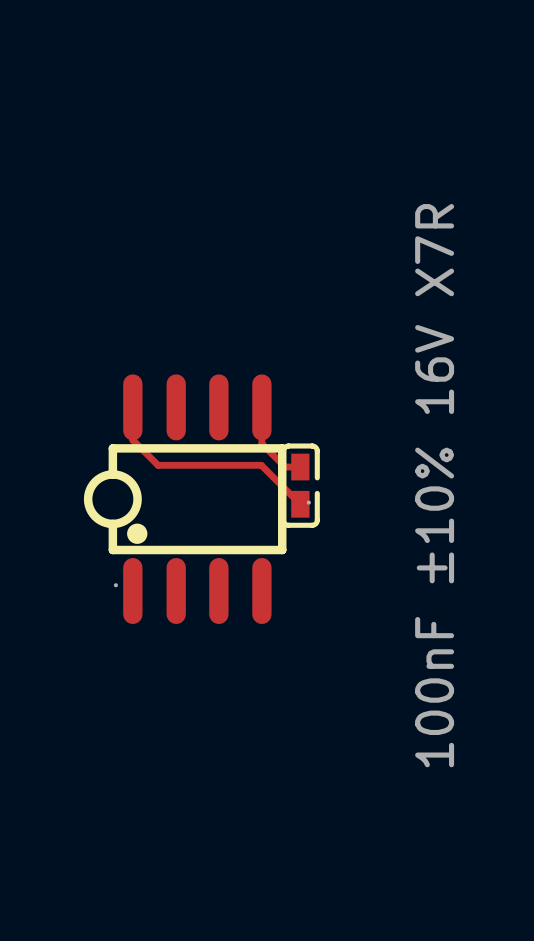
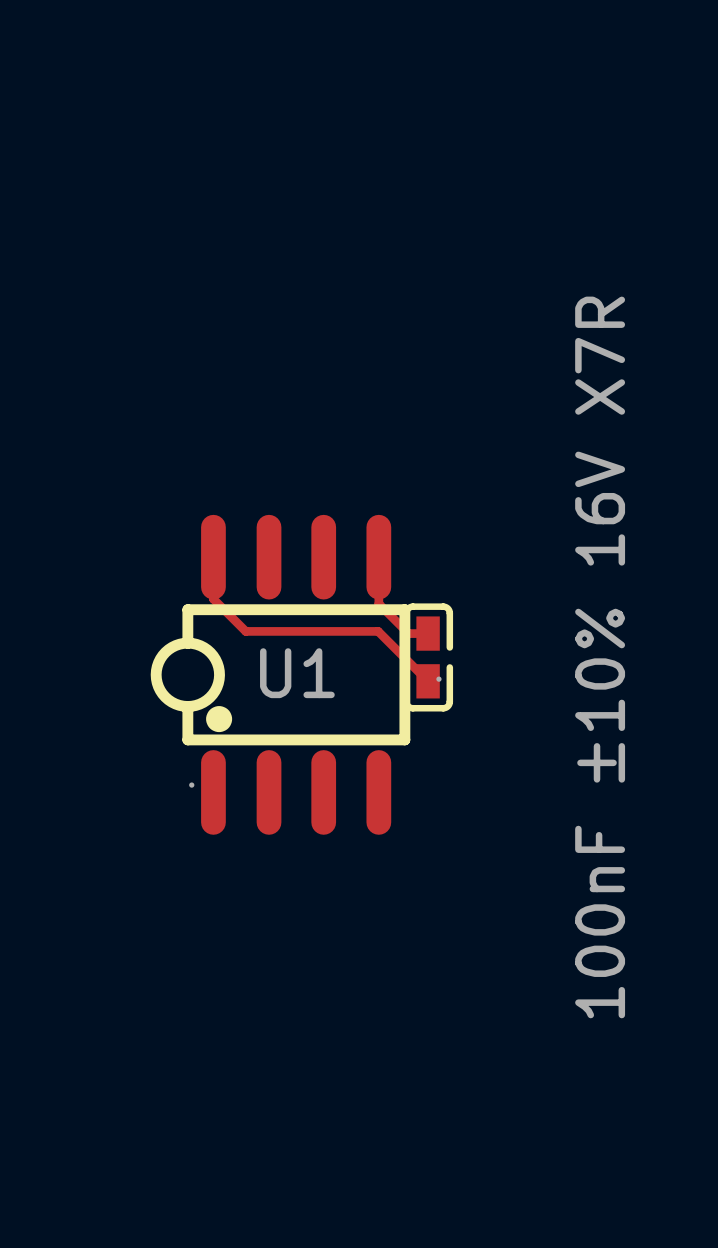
U1 name: none -> U1 (297, 673)

